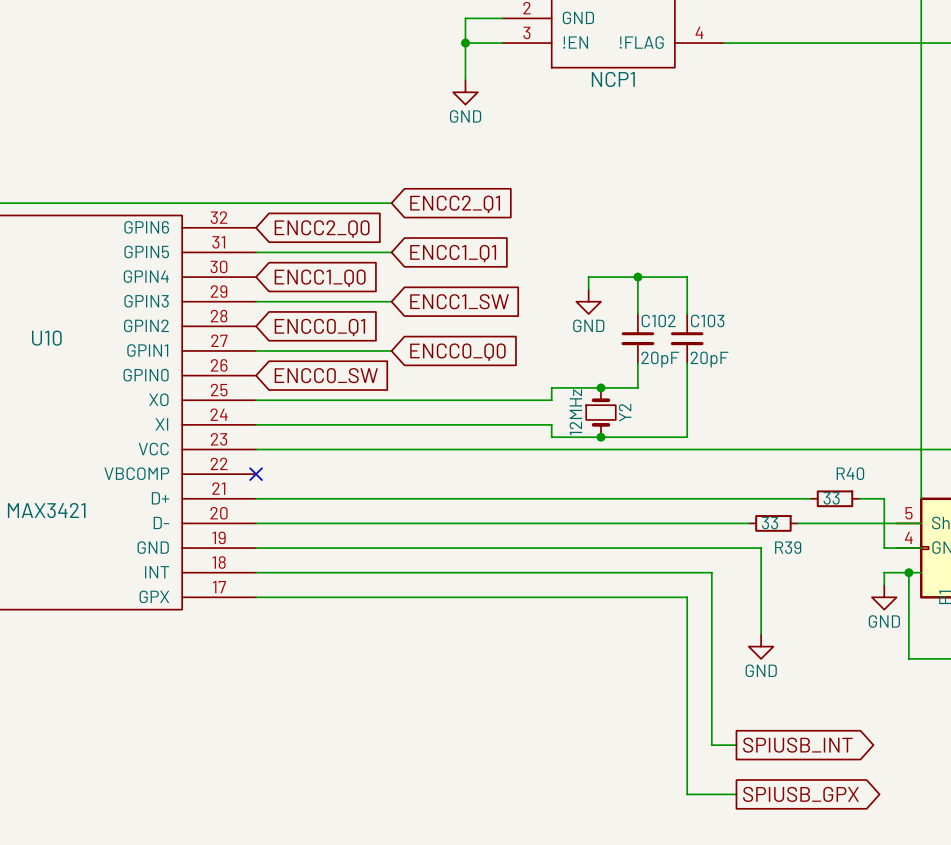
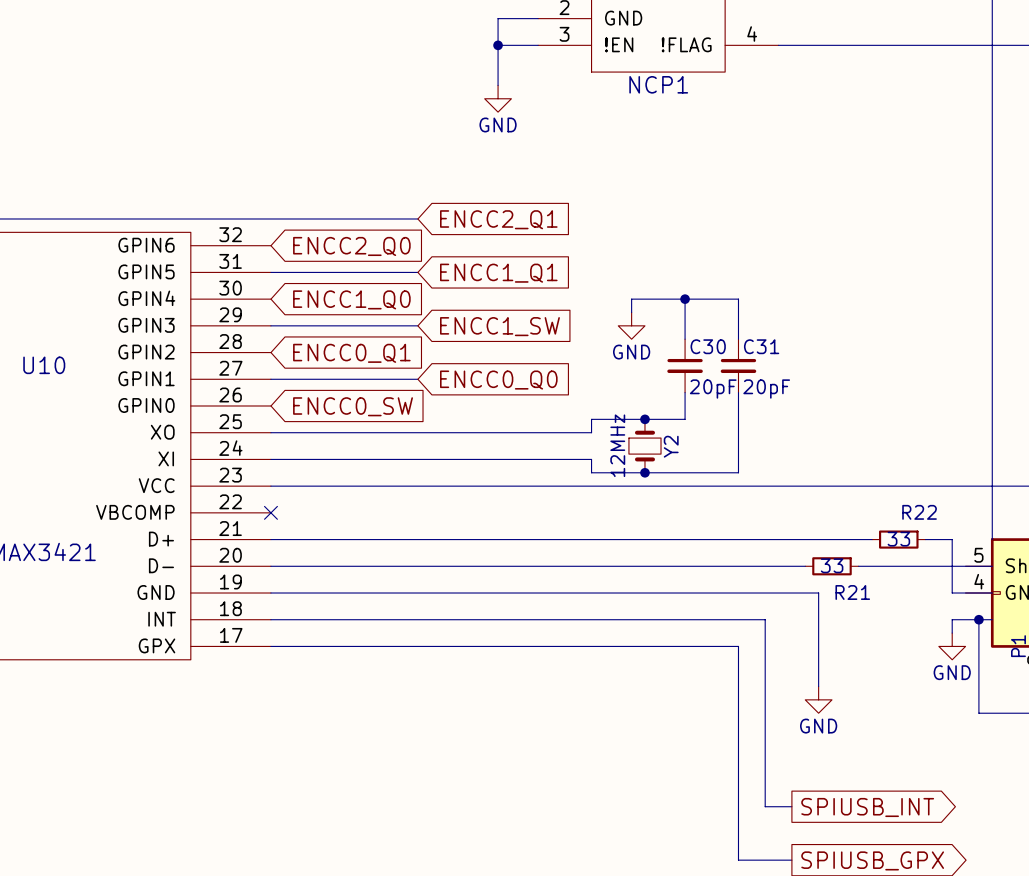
C102 name: C102 (658, 320) -> C30 (708, 346)
C103 name: C103 (707, 320) -> C31 (761, 346)
R40 name: R40 (850, 473) -> R22 (919, 512)
R39 name: R39 (788, 547) -> R21 (852, 592)

